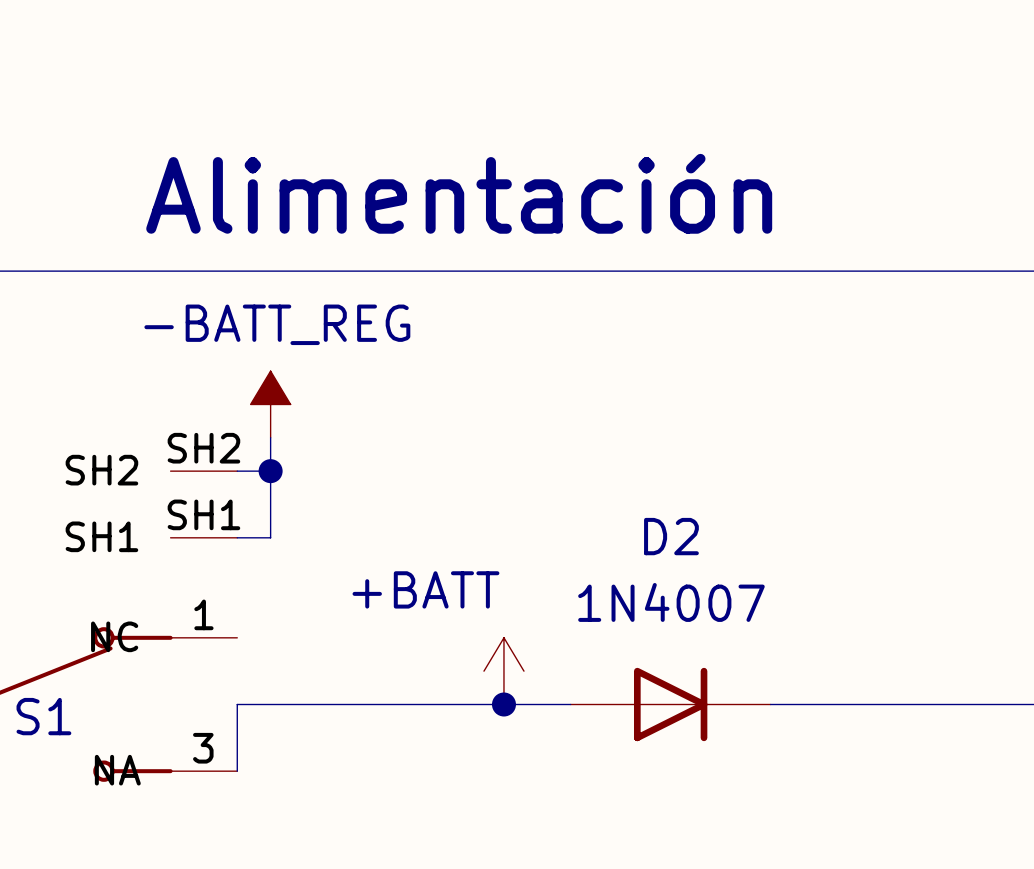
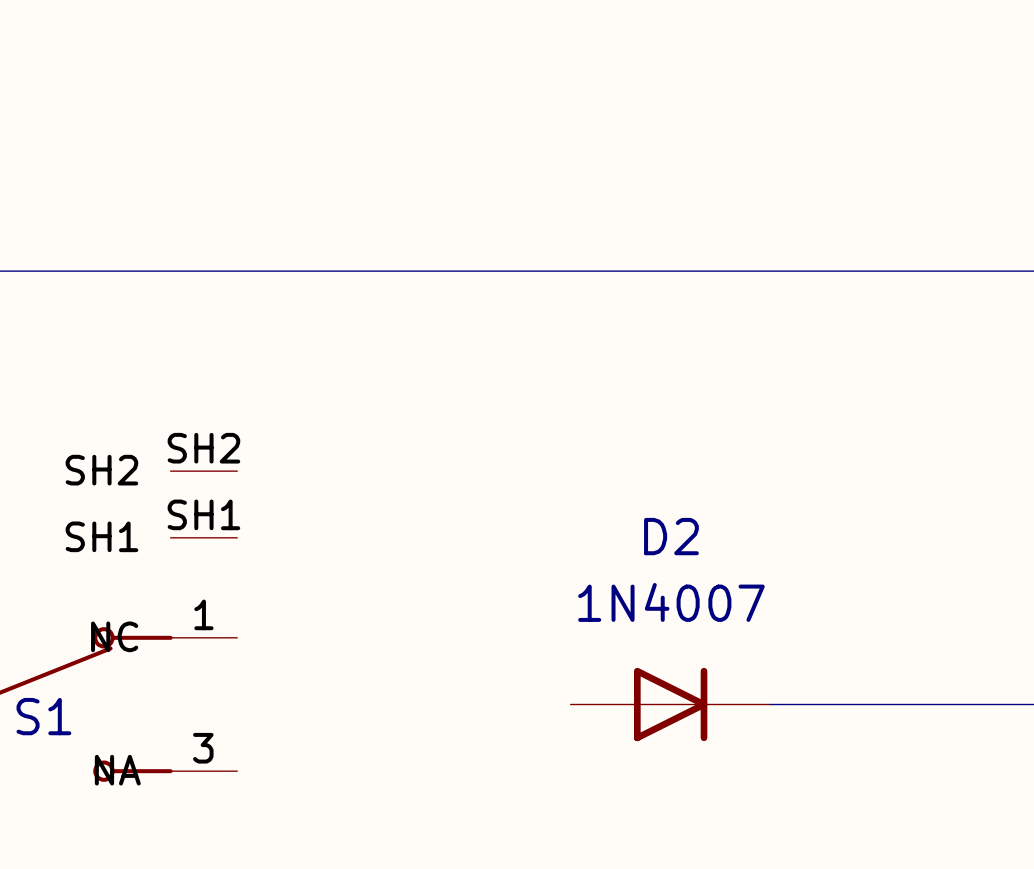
text: Alimentación (459, 193) -> none
power symbol: -BATT_REG (270, 404) -> none
wire: (270, 437) (270, 537) (237, 537) -> none
wire: (237, 471) (270, 471) -> none
junction: (270, 471) -> none
power symbol: +BATT (503, 671) -> none
junction: (503, 704) -> none
wire: (570, 704) (237, 704) (237, 771) -> none

